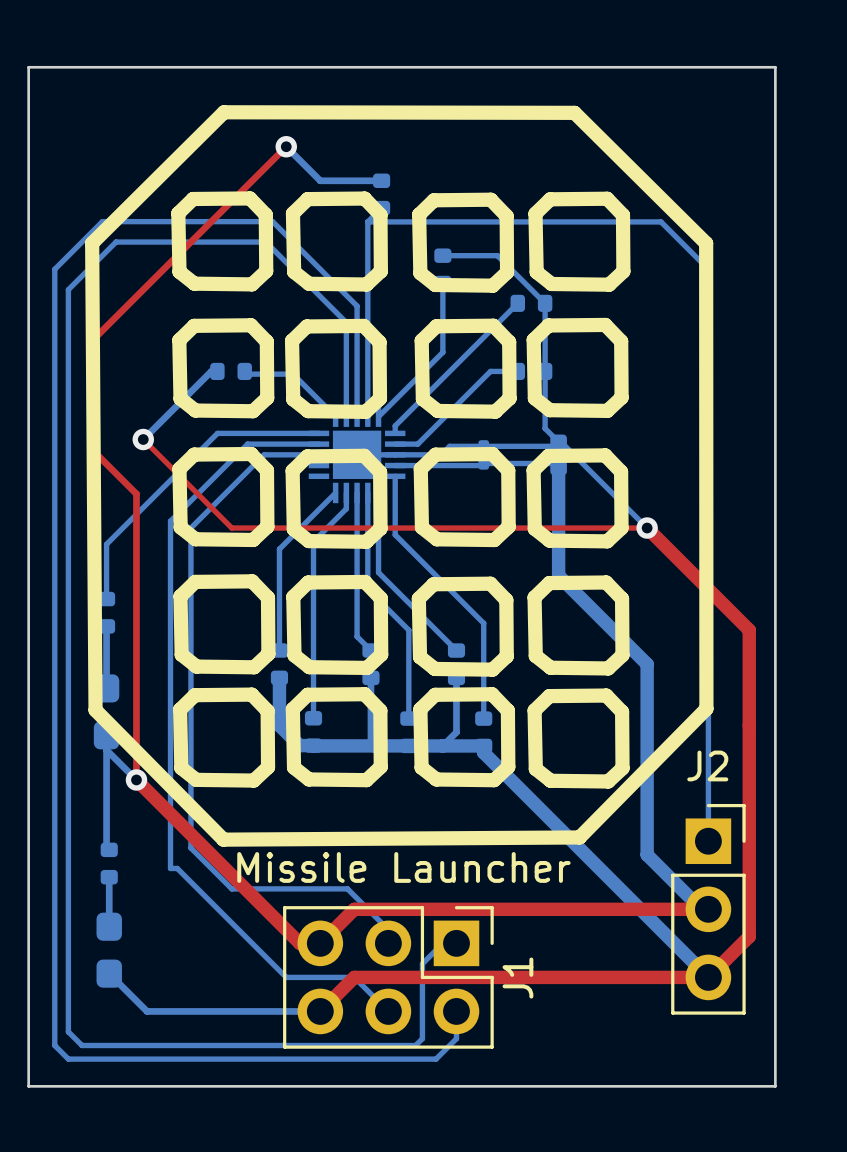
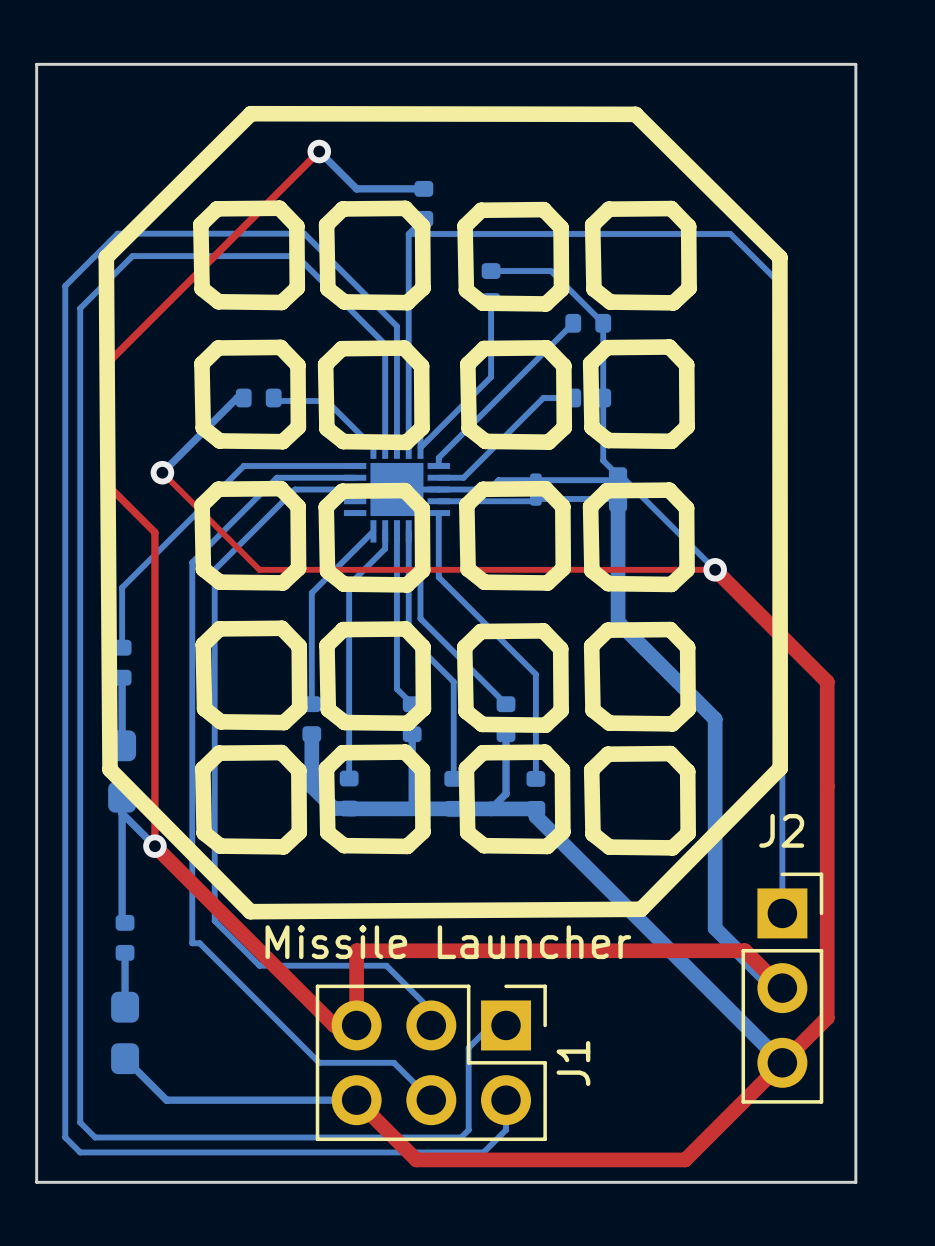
top track: (708, 909) (354, 909) (320, 943) -> (782, 988) (745, 950) (356, 950) (356, 1025)
top track: (708, 977) (354, 977) (320, 1011) -> (782, 1062) (685, 1159) (416, 1159) (356, 1100)

